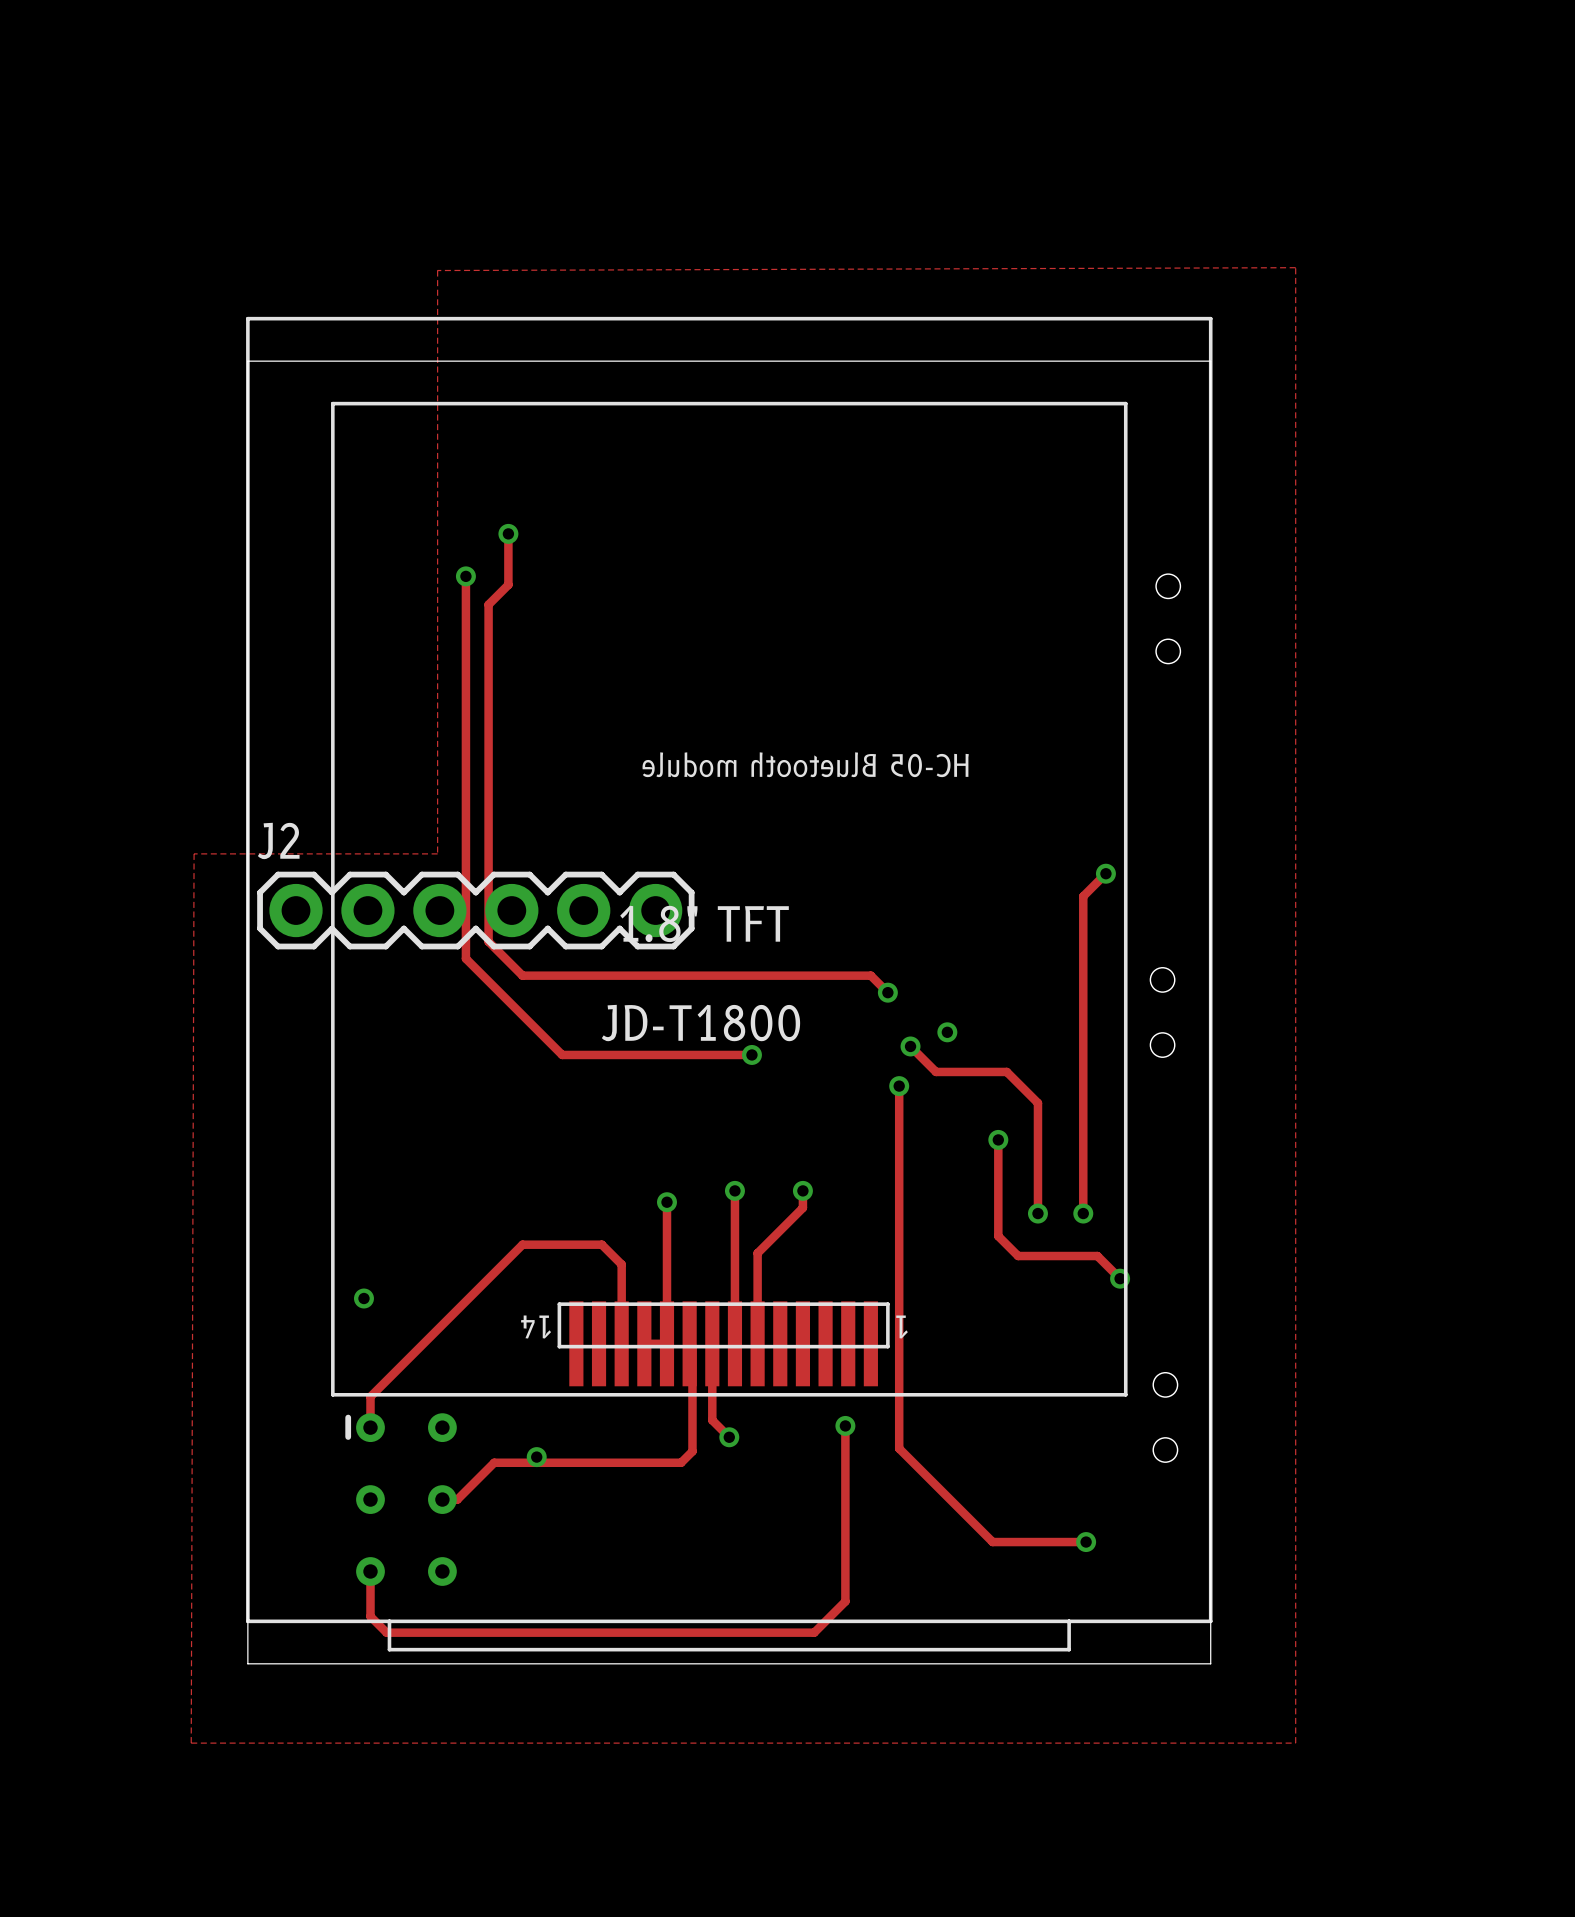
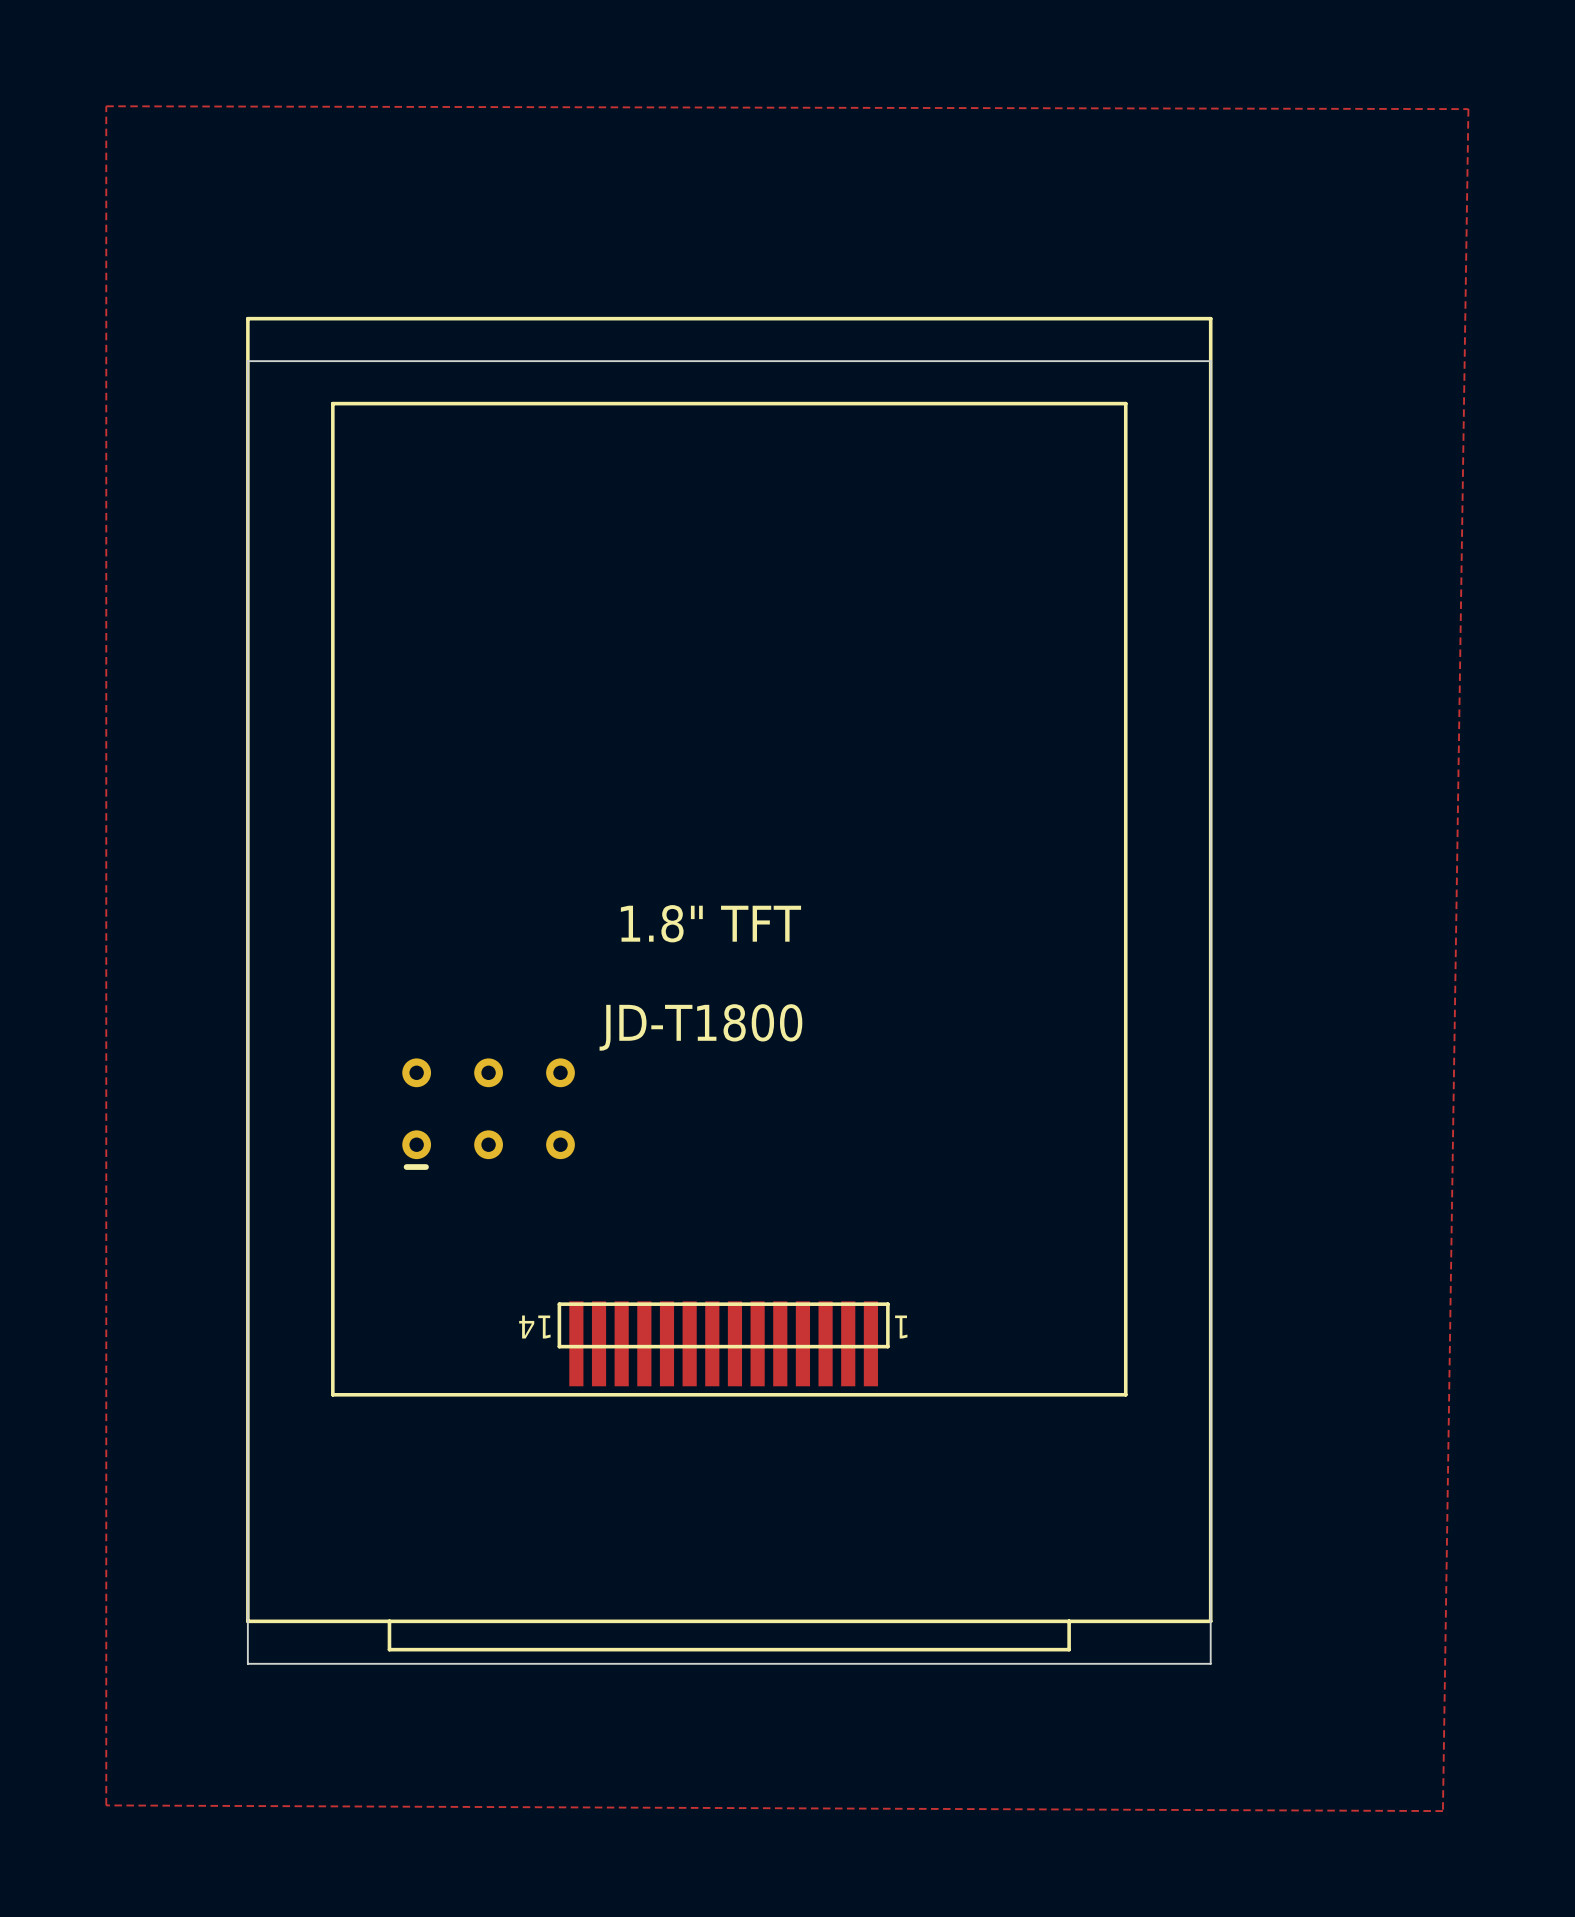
zone outline: (1295, 267) (1295, 1743) (191, 1743) (194, 853) (437, 853) (437, 270) (1295, 267) -> (106, 106) (106, 1805) (1442, 1811) (1468, 109) (106, 106)
track: (508, 533) (508, 584) (488, 604) (488, 941) (522, 975) (870, 975) (887, 992) -> none
via: (508, 533) -> none
track: (465, 576) (465, 958) (562, 1054) (751, 1054) -> none
via: (465, 576) -> none
part: (1168, 618) -> none
part: (805, 764) -> none
track: (1105, 873) (1083, 896) (1083, 1213) -> none
via: (1105, 873) -> none
J2: (475, 910) -> none
via: (887, 992) -> none
part: (1162, 1012) -> none
via: (947, 1032) -> none
track: (910, 1046) (936, 1071) (1006, 1071) (1037, 1103) (1037, 1213) -> none
via: (910, 1046) -> none
via: (751, 1054) -> none
track: (899, 1086) (899, 1448) (992, 1542) (1086, 1542) -> none
via: (899, 1086) -> none
track: (998, 1139) (998, 1236) (1018, 1256) (1097, 1256) (1120, 1278) -> none
via: (998, 1139) -> none
track: (734, 1190) (734, 1343) -> none
via: (734, 1190) -> none
track: (802, 1190) (802, 1207) (757, 1253) (757, 1343) -> none
via: (802, 1190) -> none
track: (666, 1202) (666, 1343) (644, 1343) -> none
via: (666, 1202) -> none
via: (1037, 1213) -> none
via: (1083, 1213) -> none
via: (1120, 1278) -> none
via: (363, 1298) -> none
track: (621, 1343) (621, 1264) (601, 1244) (522, 1244) (370, 1396) (370, 1427) -> none
track: (689, 1343) (692, 1346) (692, 1451) (681, 1462) (494, 1462) (457, 1499) (442, 1499) -> none
track: (712, 1343) (712, 1420) (729, 1437) -> none
part: (1165, 1417) -> none
track: (845, 1425) (845, 1601) (814, 1632) (386, 1632) (370, 1616) (370, 1571) -> none
via: (845, 1425) -> none
via: (729, 1437) -> none
via: (536, 1457) -> none
part rotation: 0° (401, 1499) -> 90° counterclockwise (488, 1114)
part position: (401, 1499) -> (488, 1114)
via: (1086, 1542) -> none

